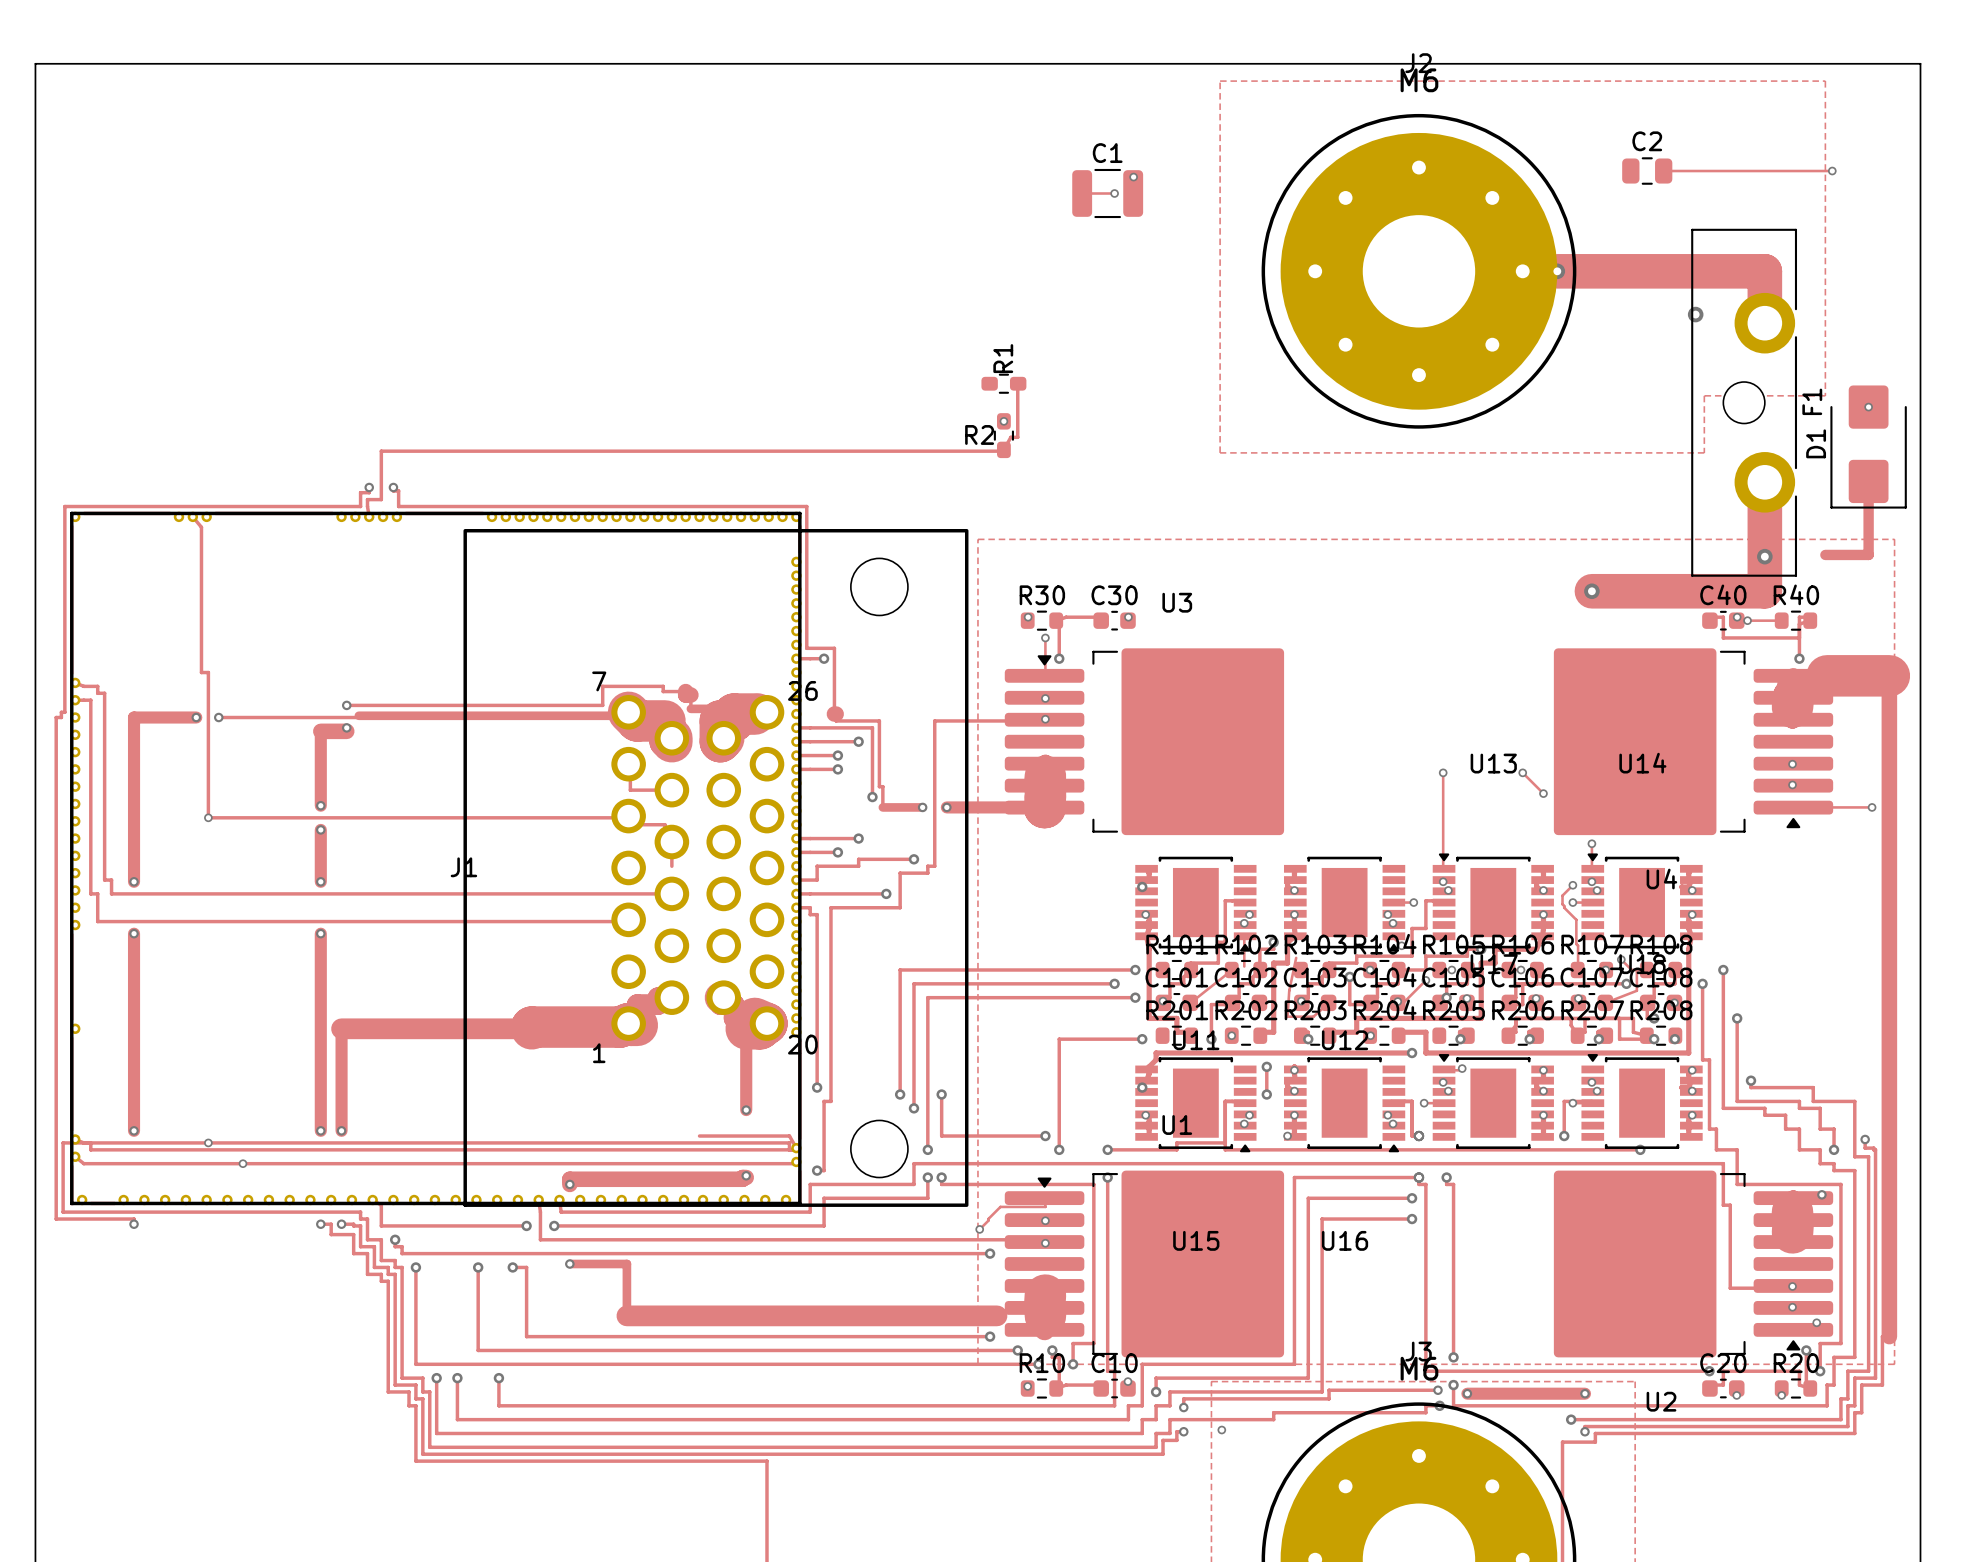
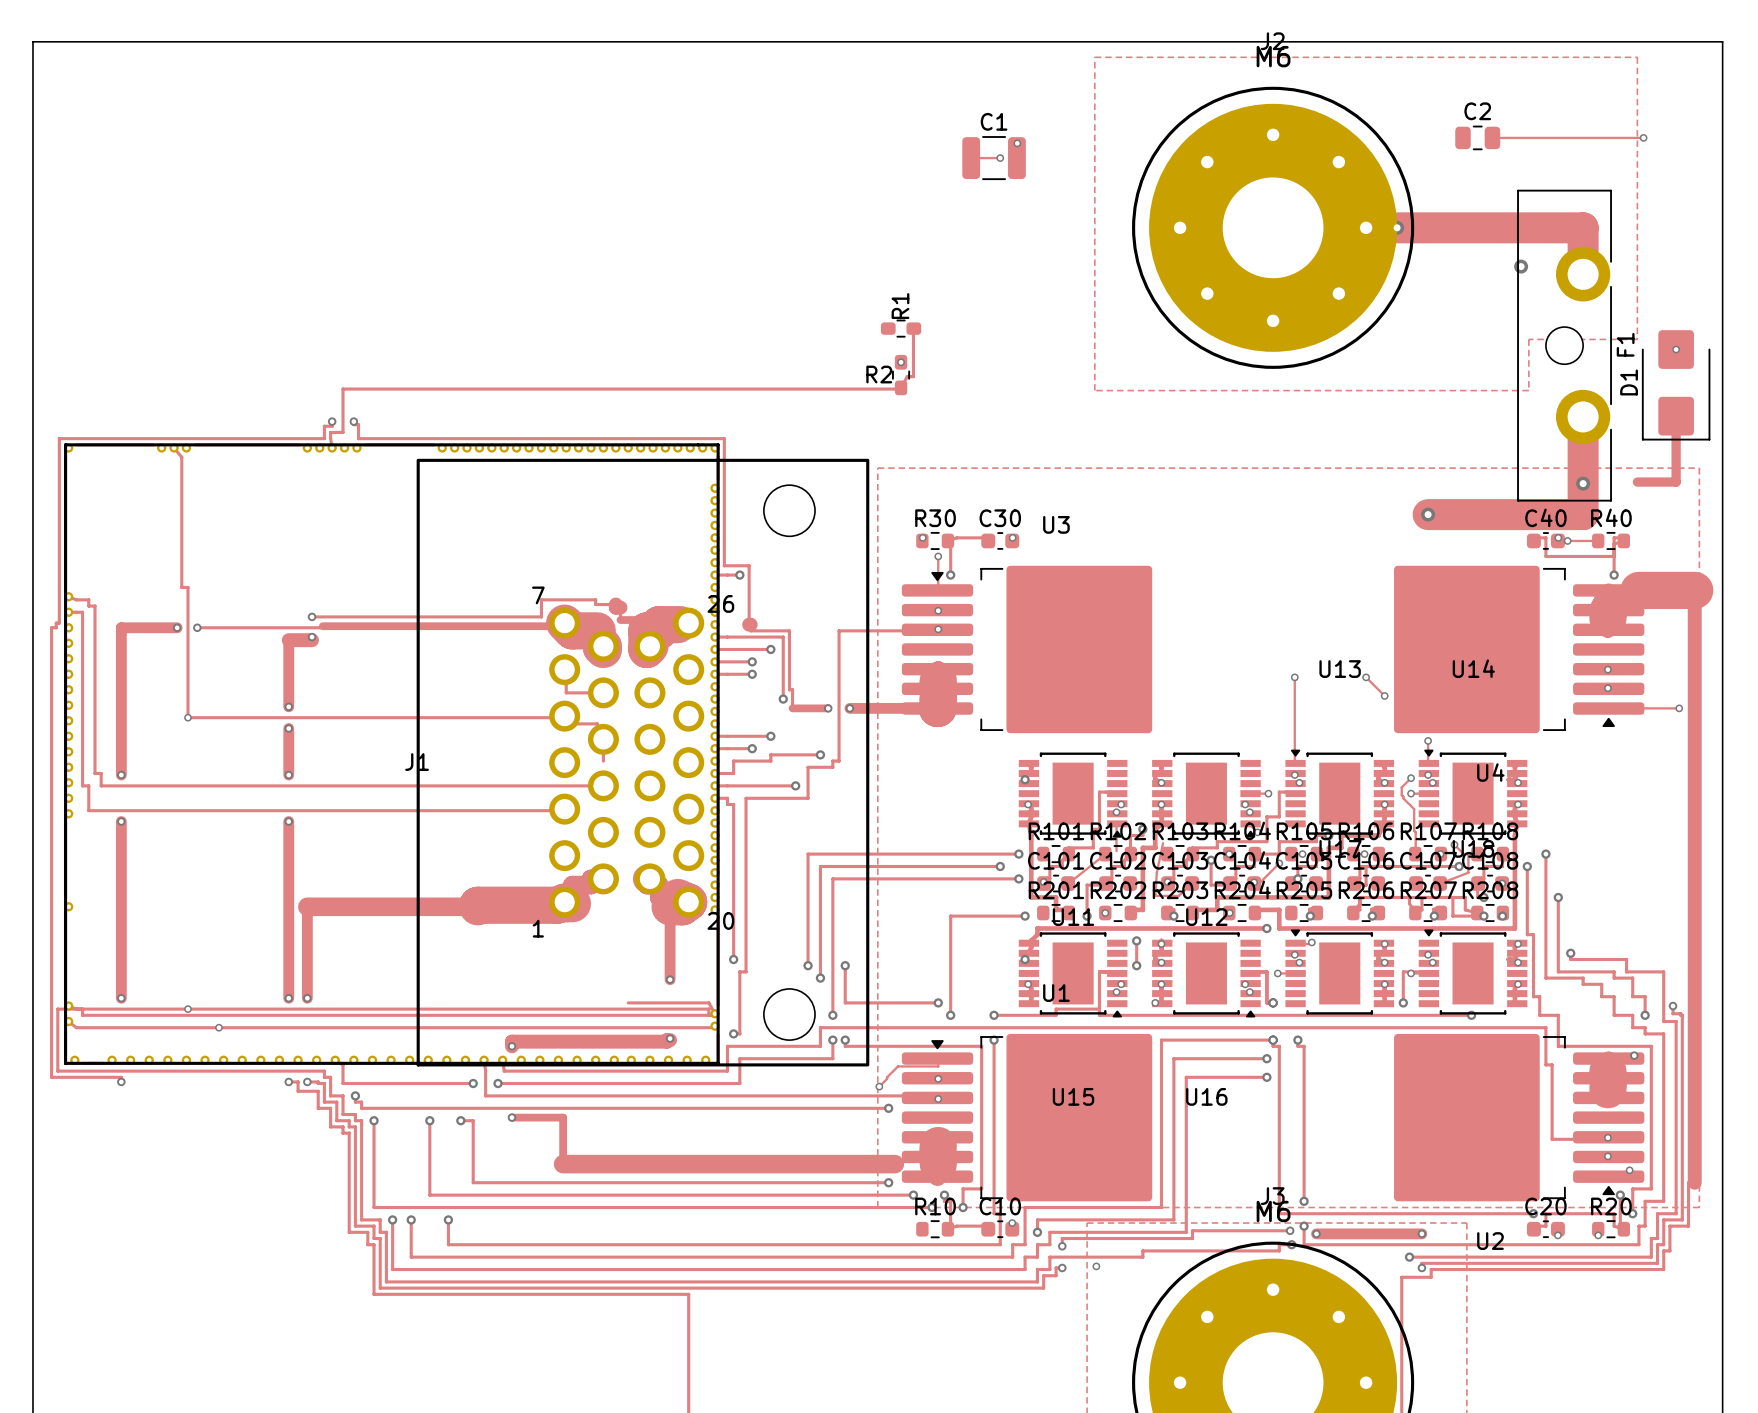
via: (1466, 998) -> none
via: (1536, 998) -> none
via: (1578, 998) -> none
via: (1027, 1386) -> none

